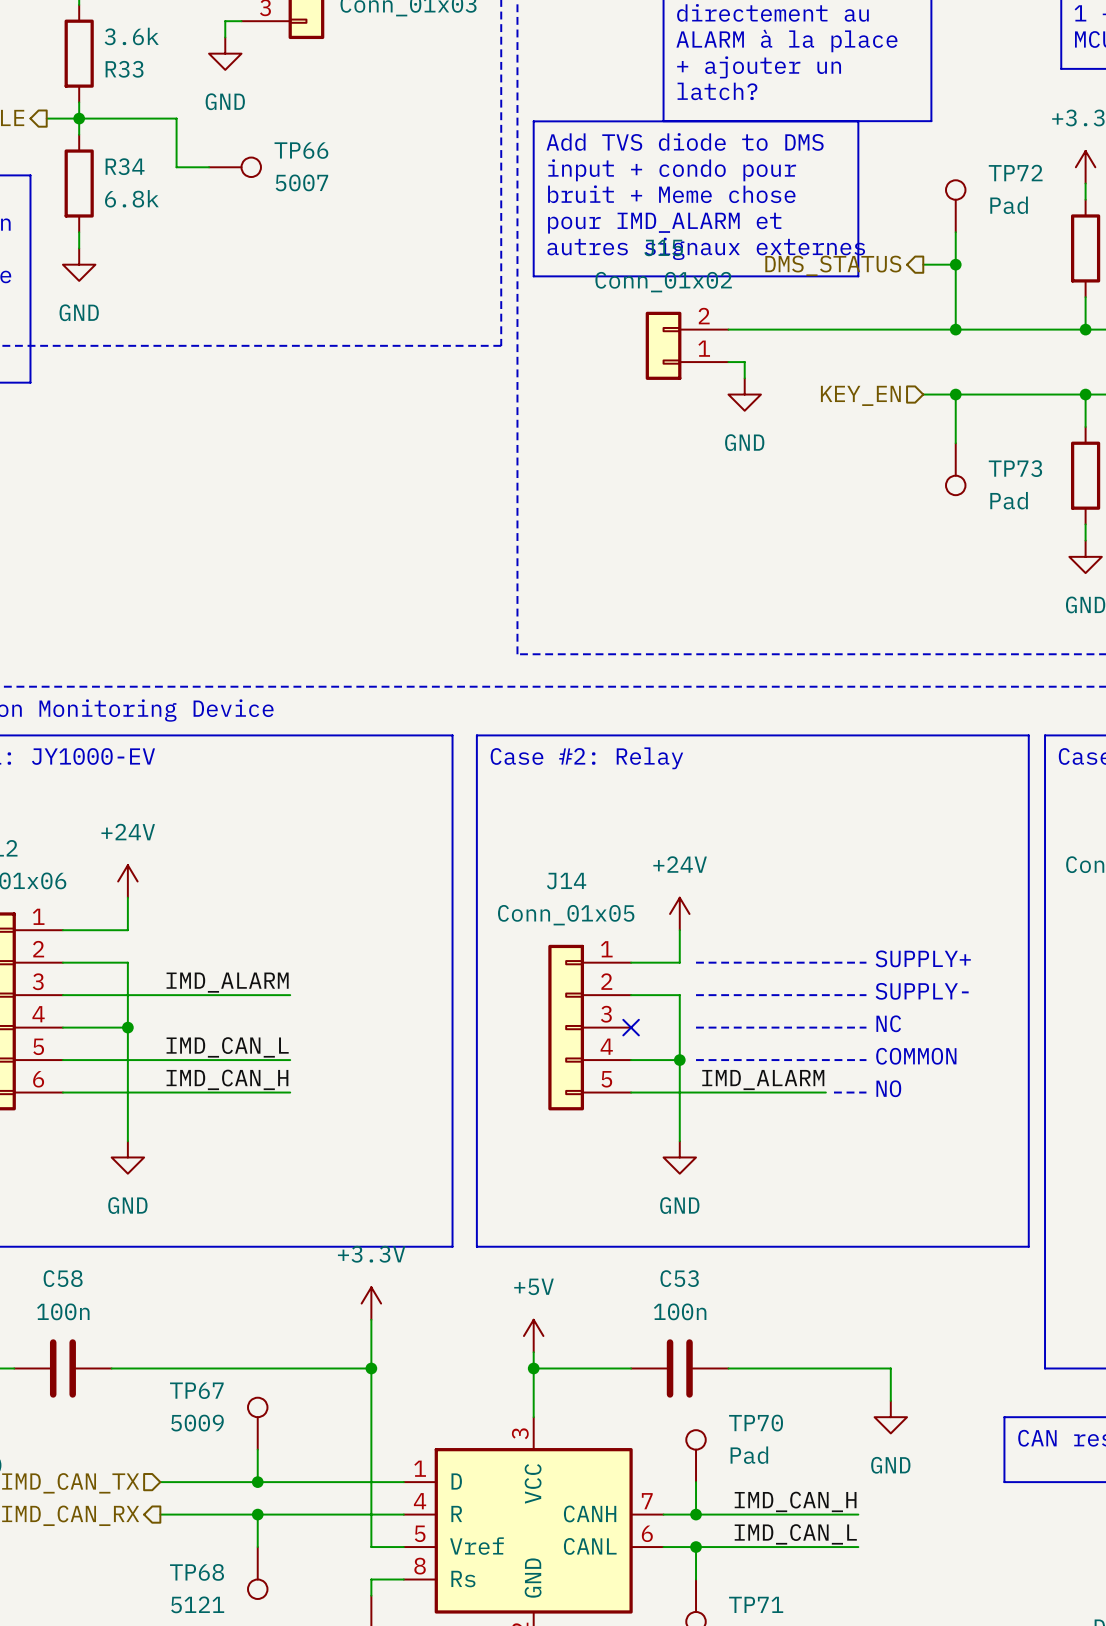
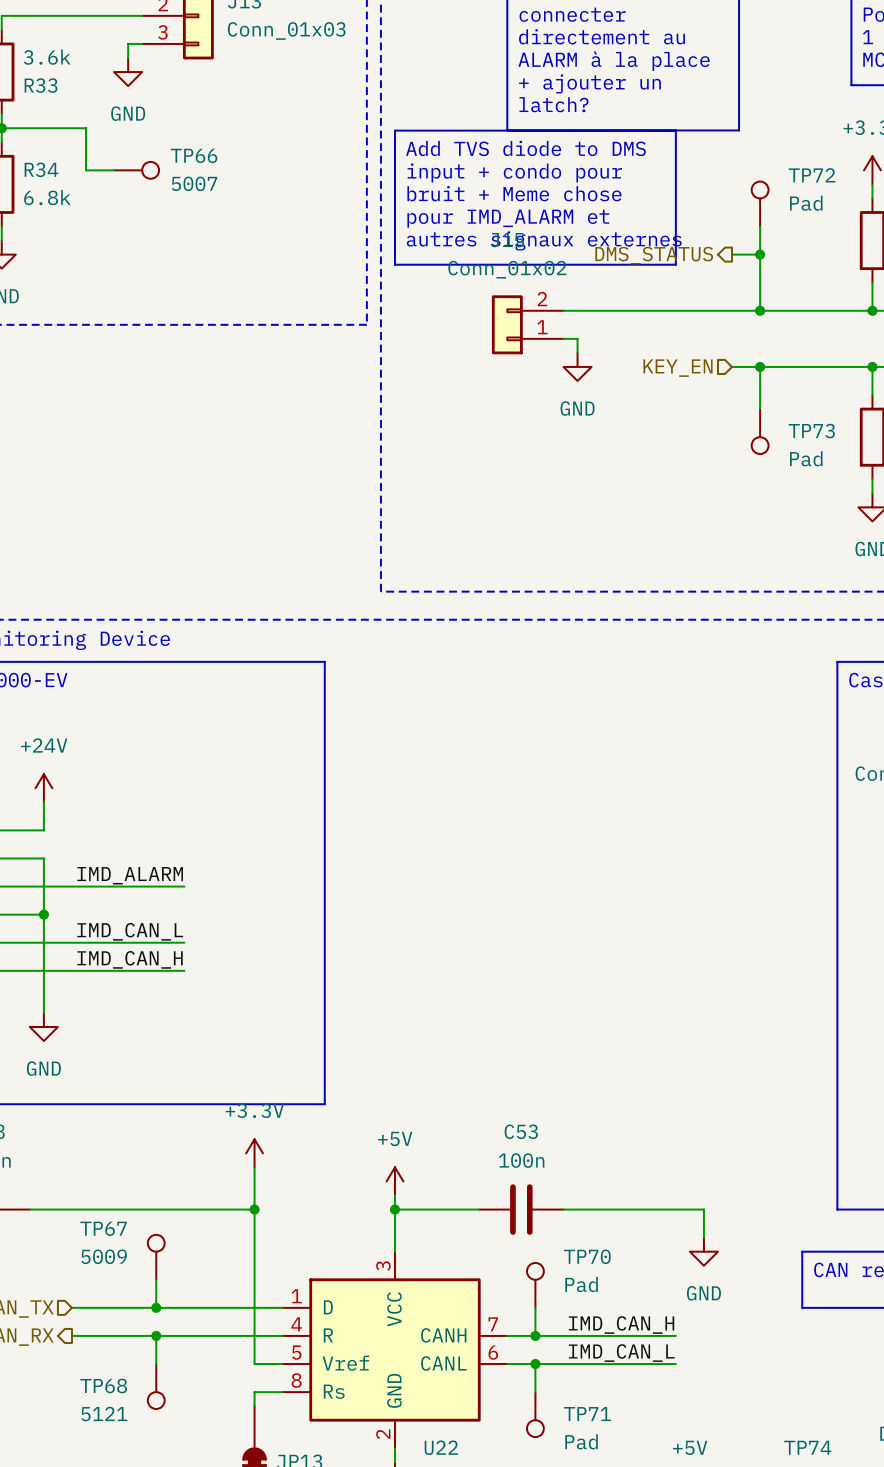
line: (476, 735) (1028, 735) (1028, 1246) (476, 1246) (476, 735) -> none
text: Case #2: Relay (586, 758) -> none
power symbol: +24V (679, 913) -> none
wire: (679, 930) (679, 962) (631, 962) -> none
text: SUPPLY+ (923, 958) -> none
line: (696, 962) (866, 962) -> none
text: SUPPLY- (922, 991) -> none
wire: (631, 995) (679, 995) (679, 1141) -> none
line: (696, 995) (866, 995) -> none
text: NC (888, 1023) -> none
J14: Conn_01x05 (589, 1027) -> none
no-connect mark: (631, 1027) -> none
line: (696, 1027) (866, 1027) -> none
text: COMMON (916, 1056) -> none
wire: (631, 1060) (679, 1060) -> none
junction: (679, 1060) -> none
line: (696, 1060) (866, 1060) -> none
label: IMD_ALARM (763, 1080) -> none
text: NO (888, 1088) -> none
wire: (631, 1092) (825, 1092) -> none
line: (833, 1092) (866, 1092) -> none
power symbol: GND (679, 1157) -> none

